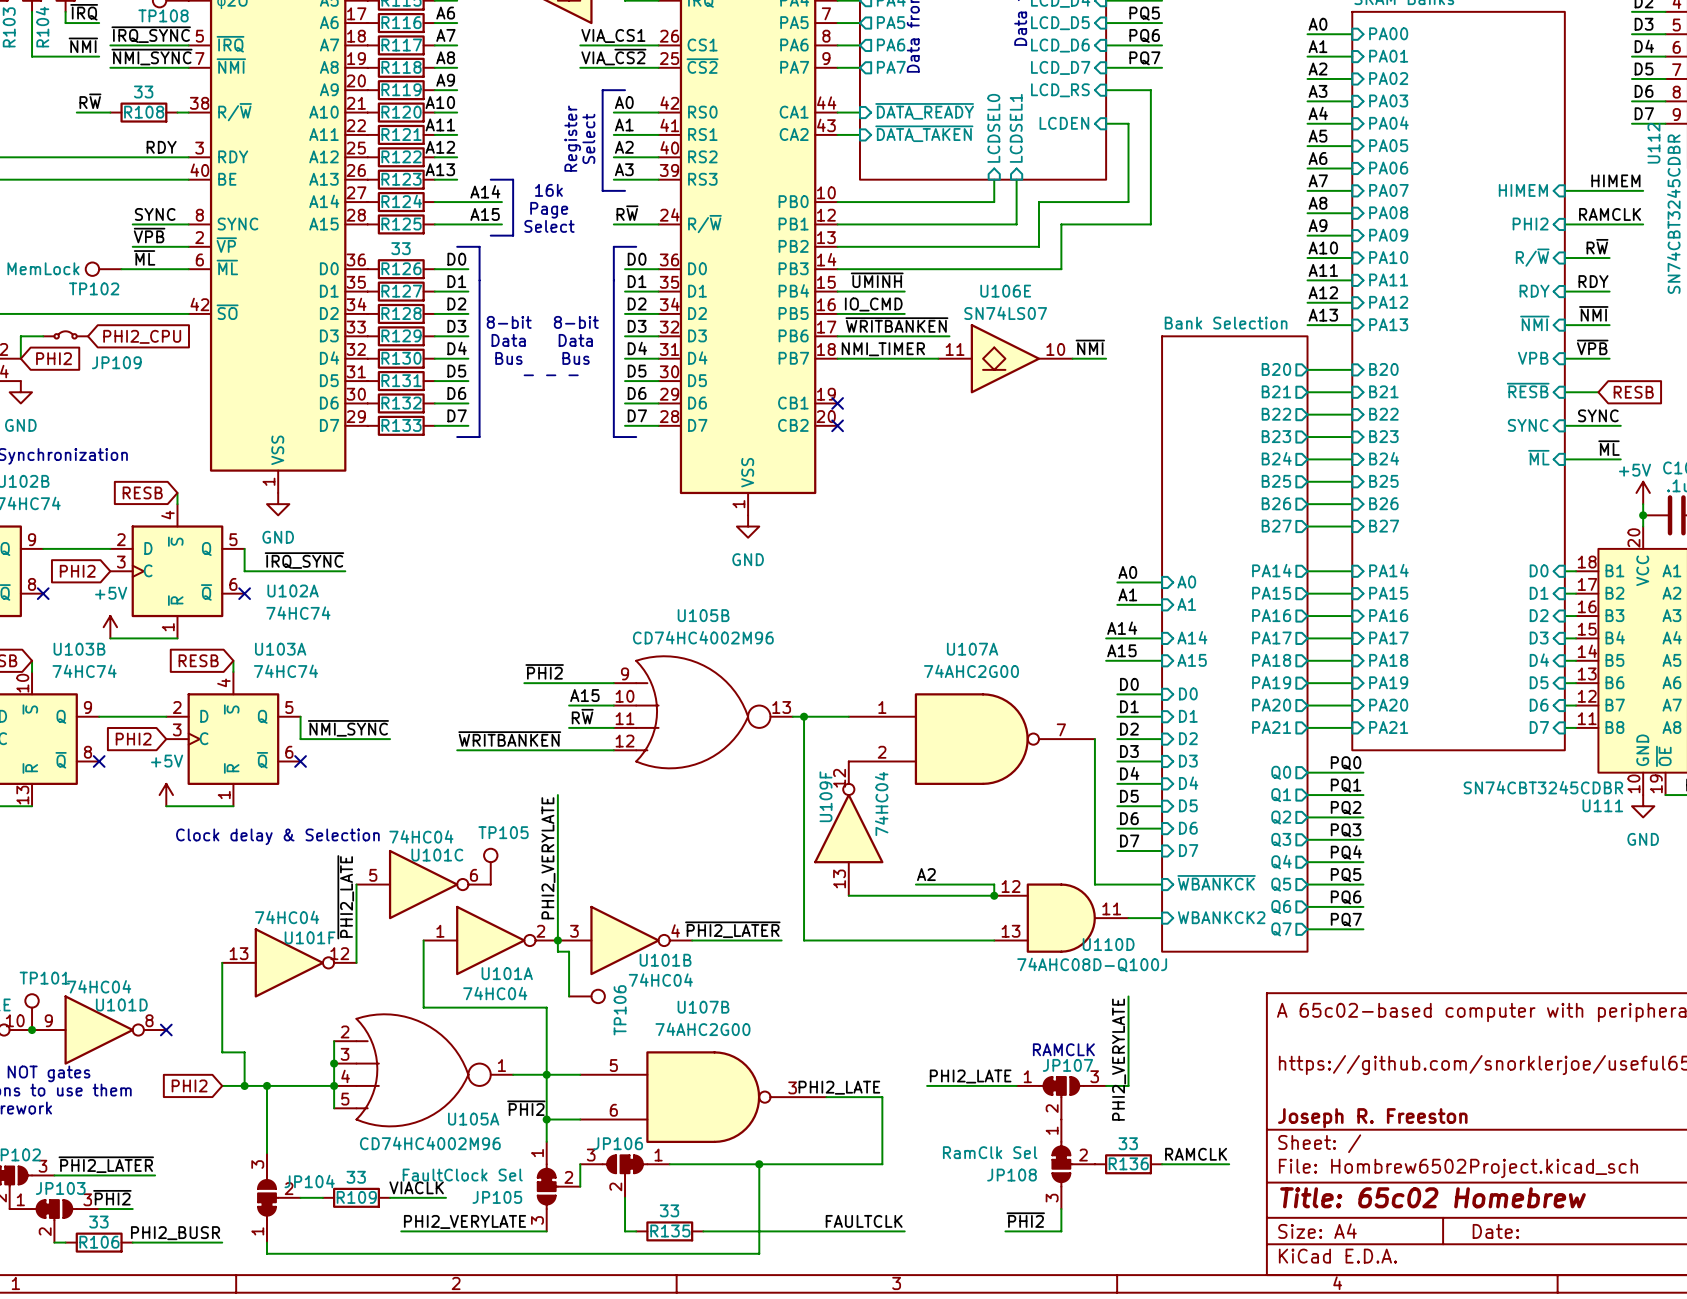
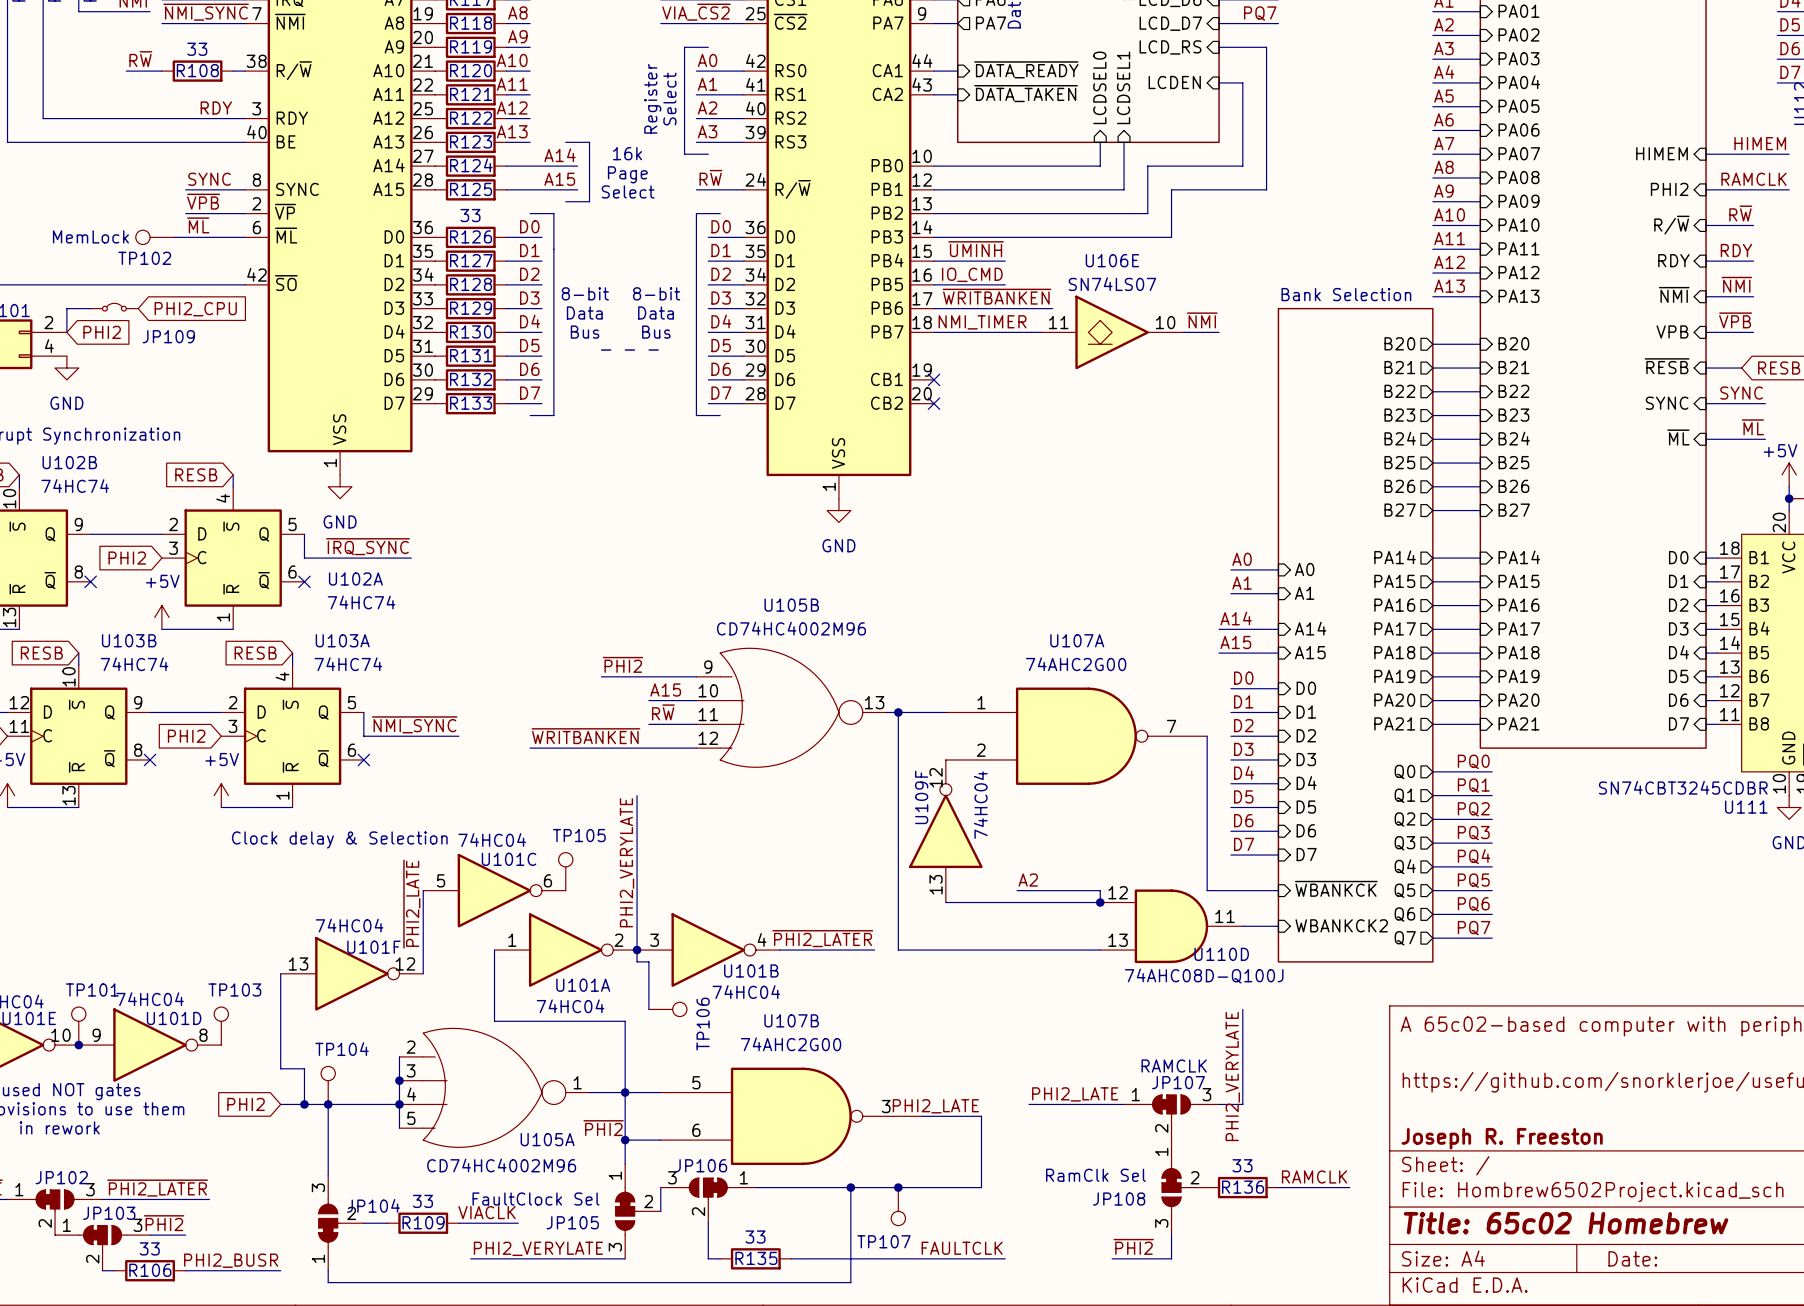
TP103: none -> (221, 1026)
no-connect mark: (166, 1030) -> none
TP104: none -> (328, 1085)
junction: none -> (898, 1187)
TP107: none -> (898, 1206)

